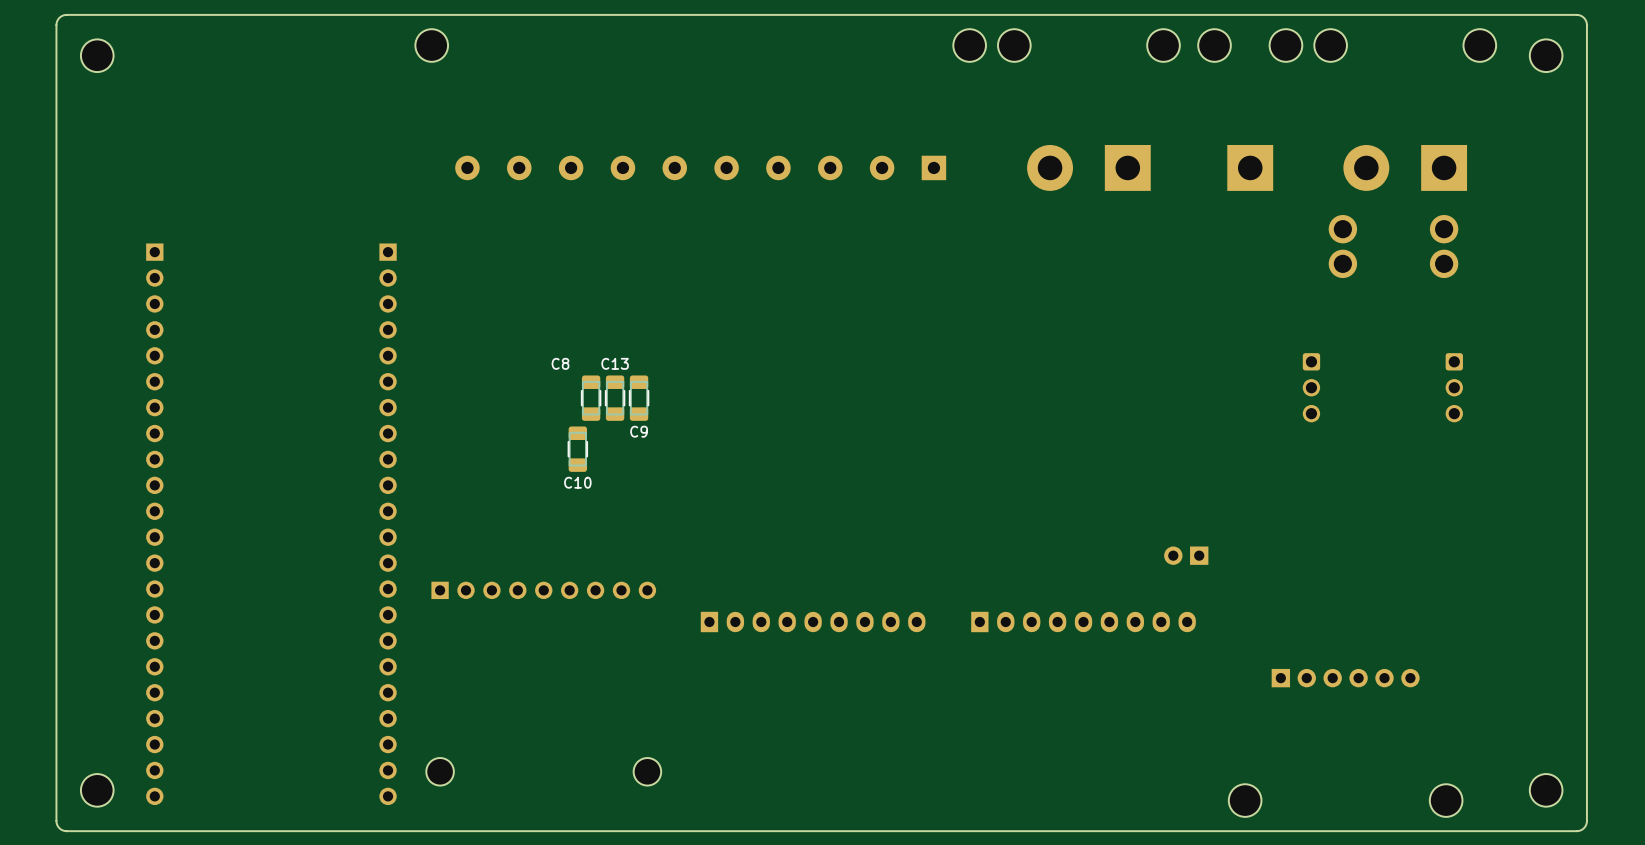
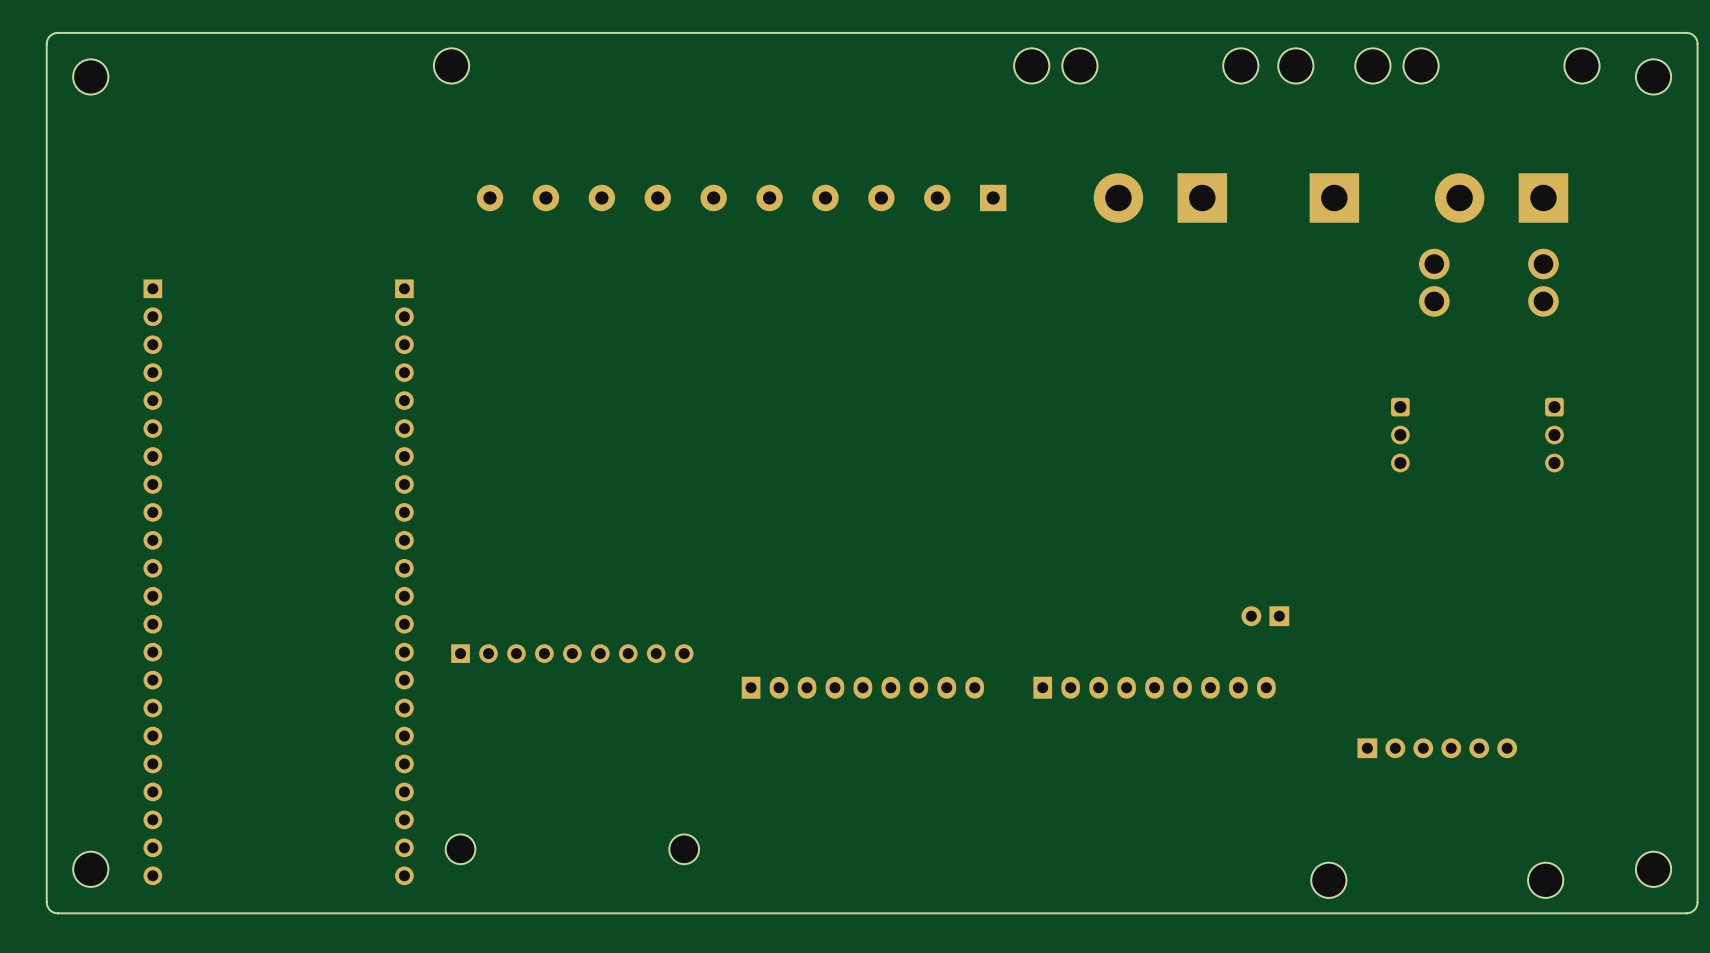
C8: (591, 398) -> none
C13: (615, 398) -> none
C9: (639, 398) -> none
C10: (577, 449) -> none

